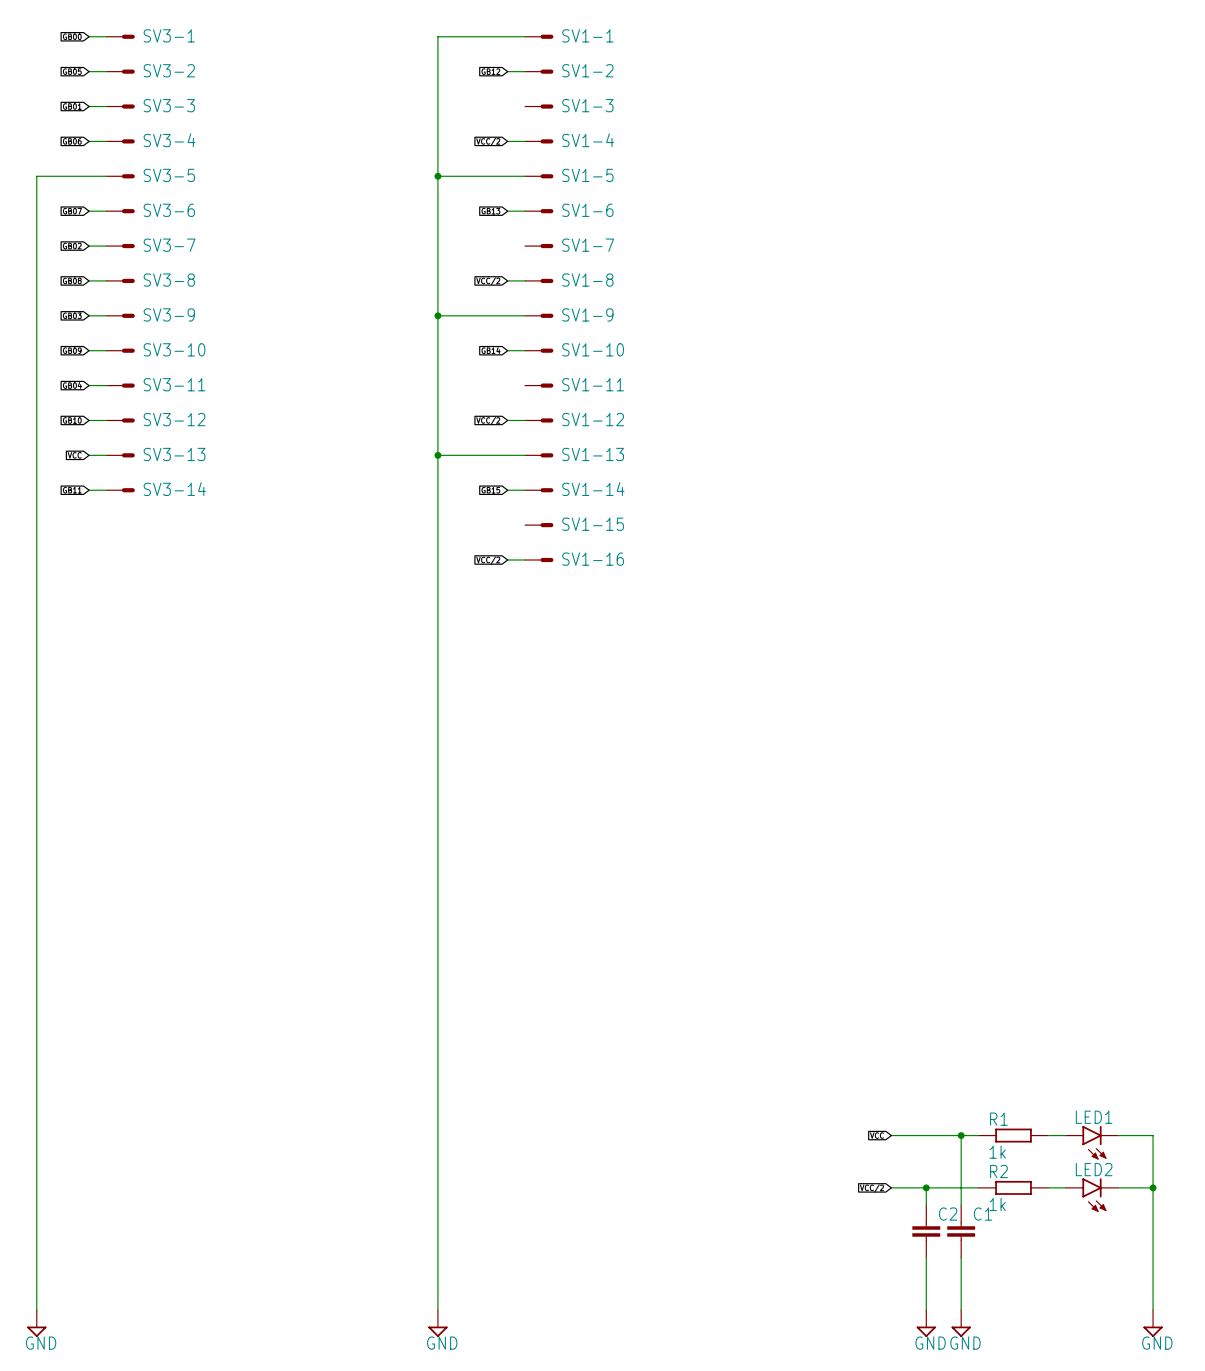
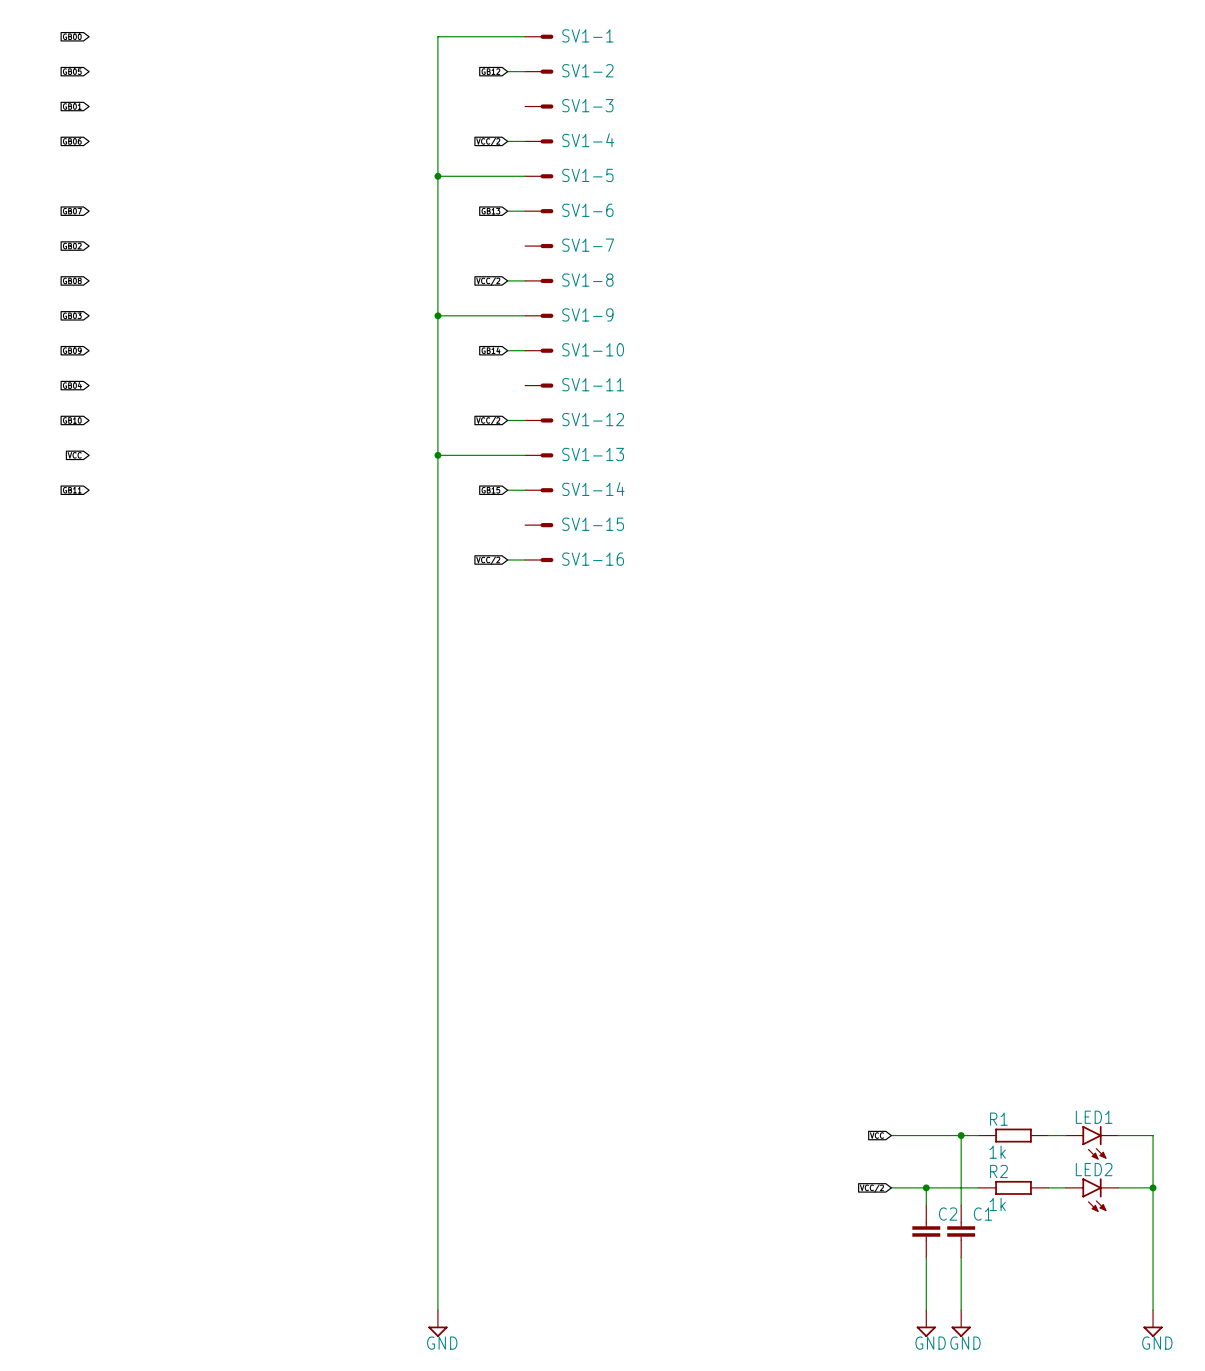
wire: (89, 36) (106, 36) -> none
SV3-1: (120, 36) -> none
wire: (89, 71) (106, 71) -> none
SV3-2: (120, 71) -> none
wire: (89, 106) (106, 106) -> none
SV3-3: (120, 106) -> none
wire: (89, 141) (106, 141) -> none
SV3-4: (120, 141) -> none
wire: (106, 176) (36, 176) (36, 1309) -> none
SV3-5: (120, 176) -> none
wire: (89, 211) (106, 211) -> none
SV3-6: (120, 211) -> none
wire: (89, 246) (106, 246) -> none
SV3-7: (120, 246) -> none
wire: (89, 280) (106, 280) -> none
SV3-8: (120, 280) -> none
wire: (89, 315) (106, 315) -> none
SV3-9: (120, 315) -> none
wire: (89, 350) (106, 350) -> none
SV3-10: (120, 350) -> none
wire: (89, 385) (106, 385) -> none
SV3-11: (120, 385) -> none
wire: (89, 420) (106, 420) -> none
SV3-12: (120, 420) -> none
wire: (89, 455) (106, 455) -> none
SV3-13: (120, 455) -> none
wire: (89, 490) (106, 490) -> none
SV3-14: (120, 490) -> none
power symbol: GND (36, 1323) -> none

